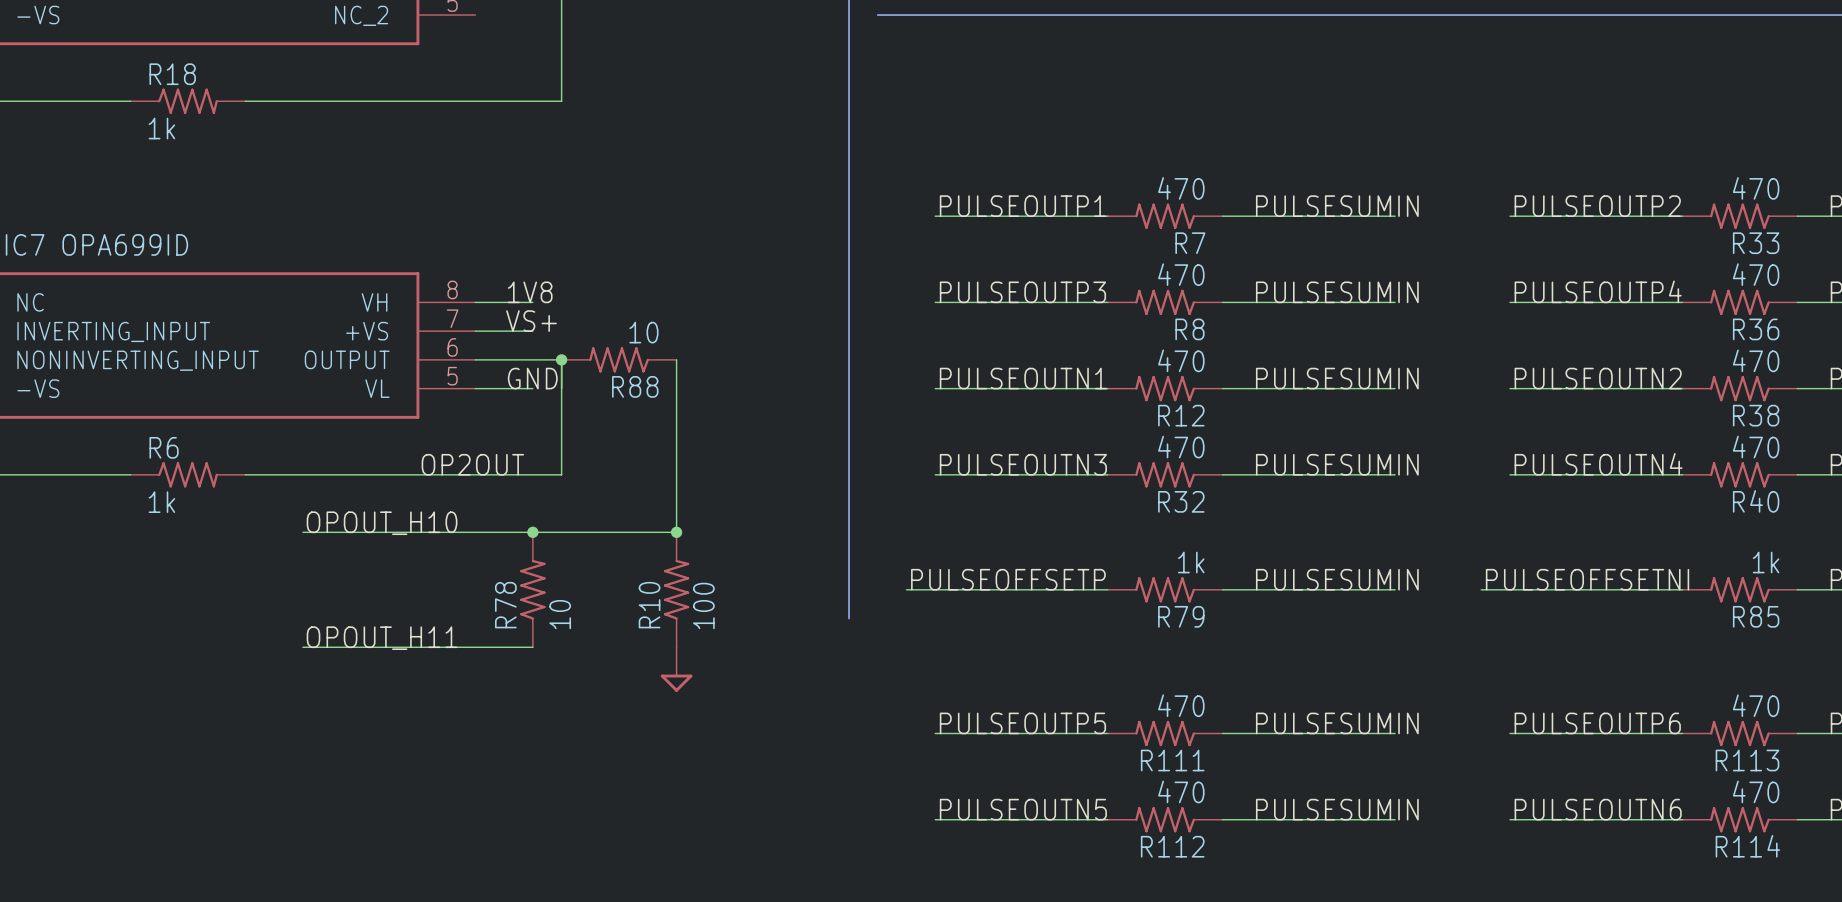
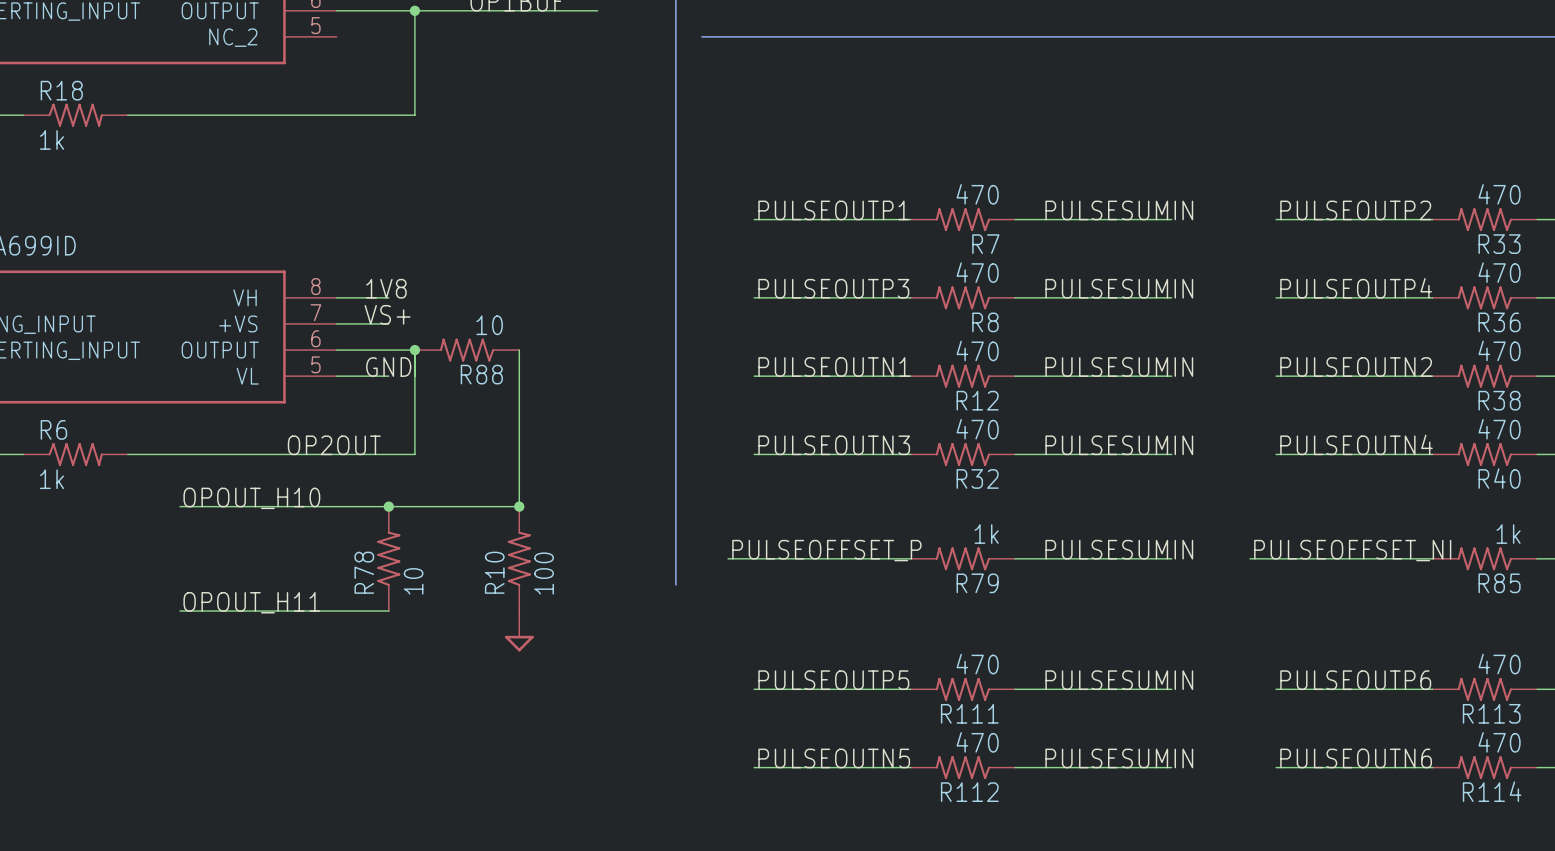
label: PULSEOFFSETP (1008, 579) -> PULSEOFFSET_P (826, 550)
label: PULSEOFFSETNI (1587, 579) -> PULSEOFFSET_NI (1352, 550)

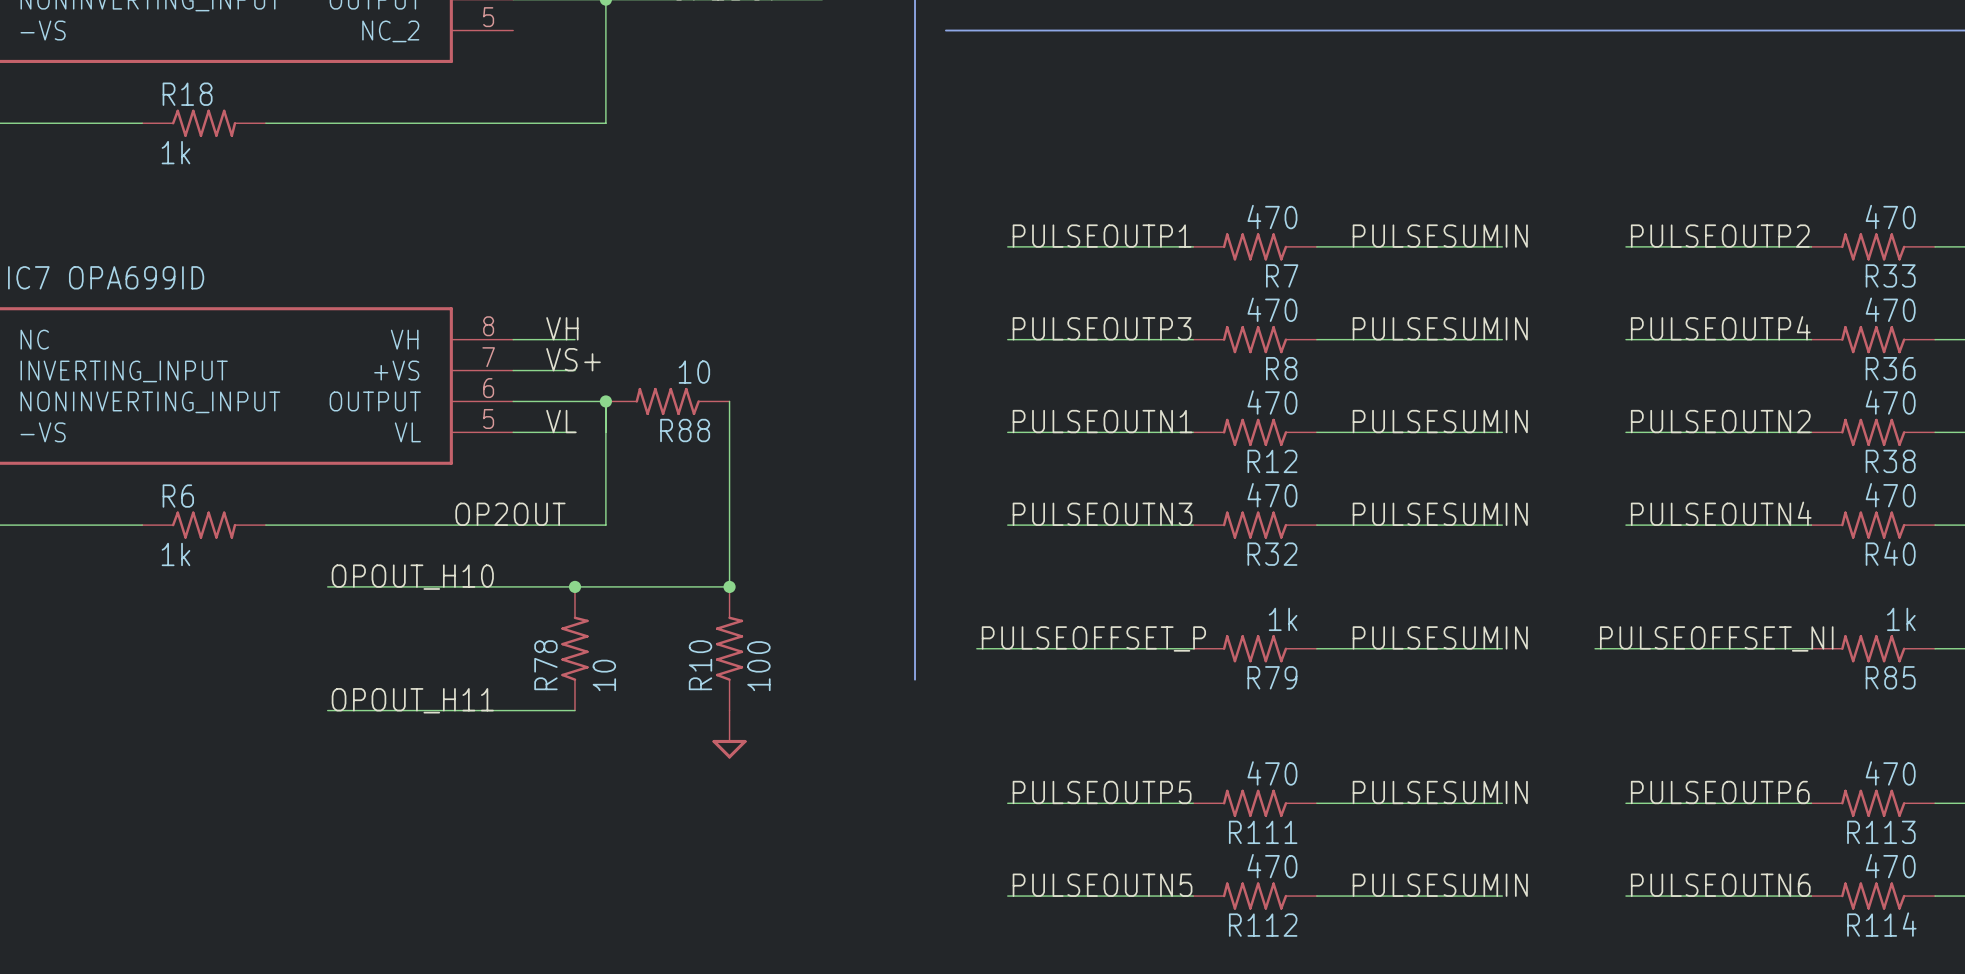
label: 1V8 (386, 288) -> VH (562, 328)
label: GND (388, 367) -> VL (561, 421)

